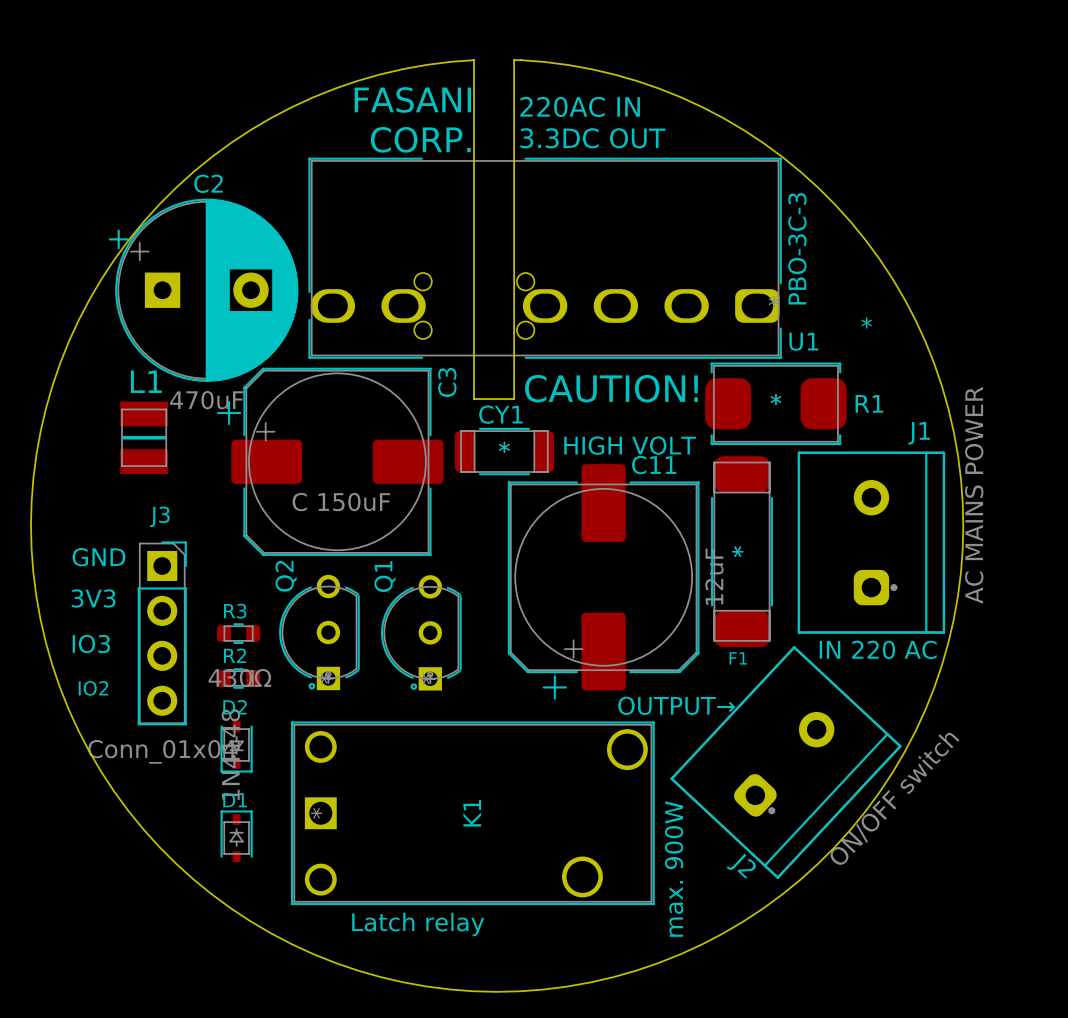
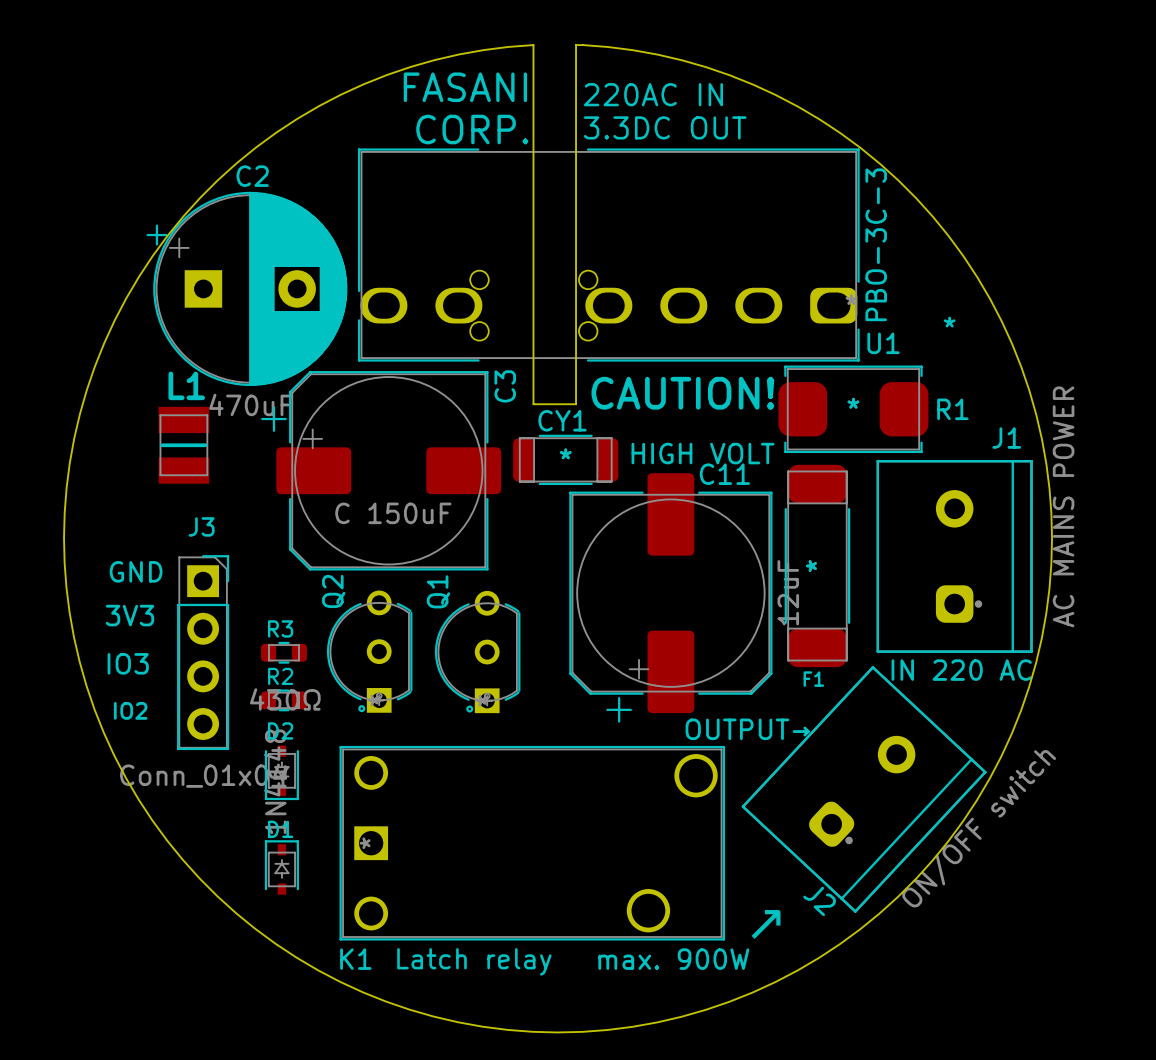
K1 name rotation: 0° (472, 813) -> 90° clockwise (355, 959)
K1 name position: K1 (472, 813) -> K1 (355, 959)
text rotation: 0° (674, 868) -> 90° clockwise (673, 959)
text: none -> ↗ (766, 924)

